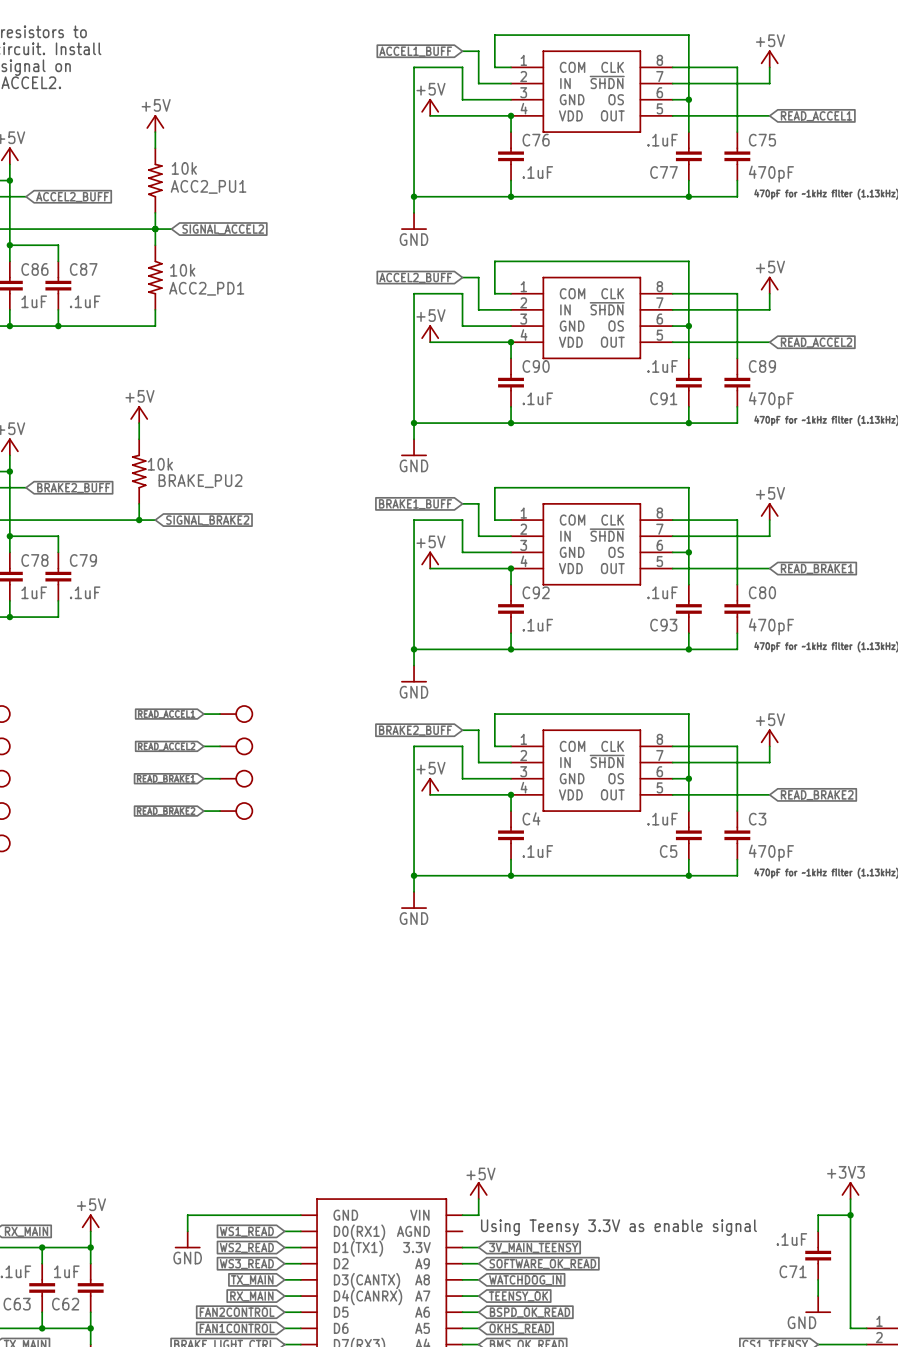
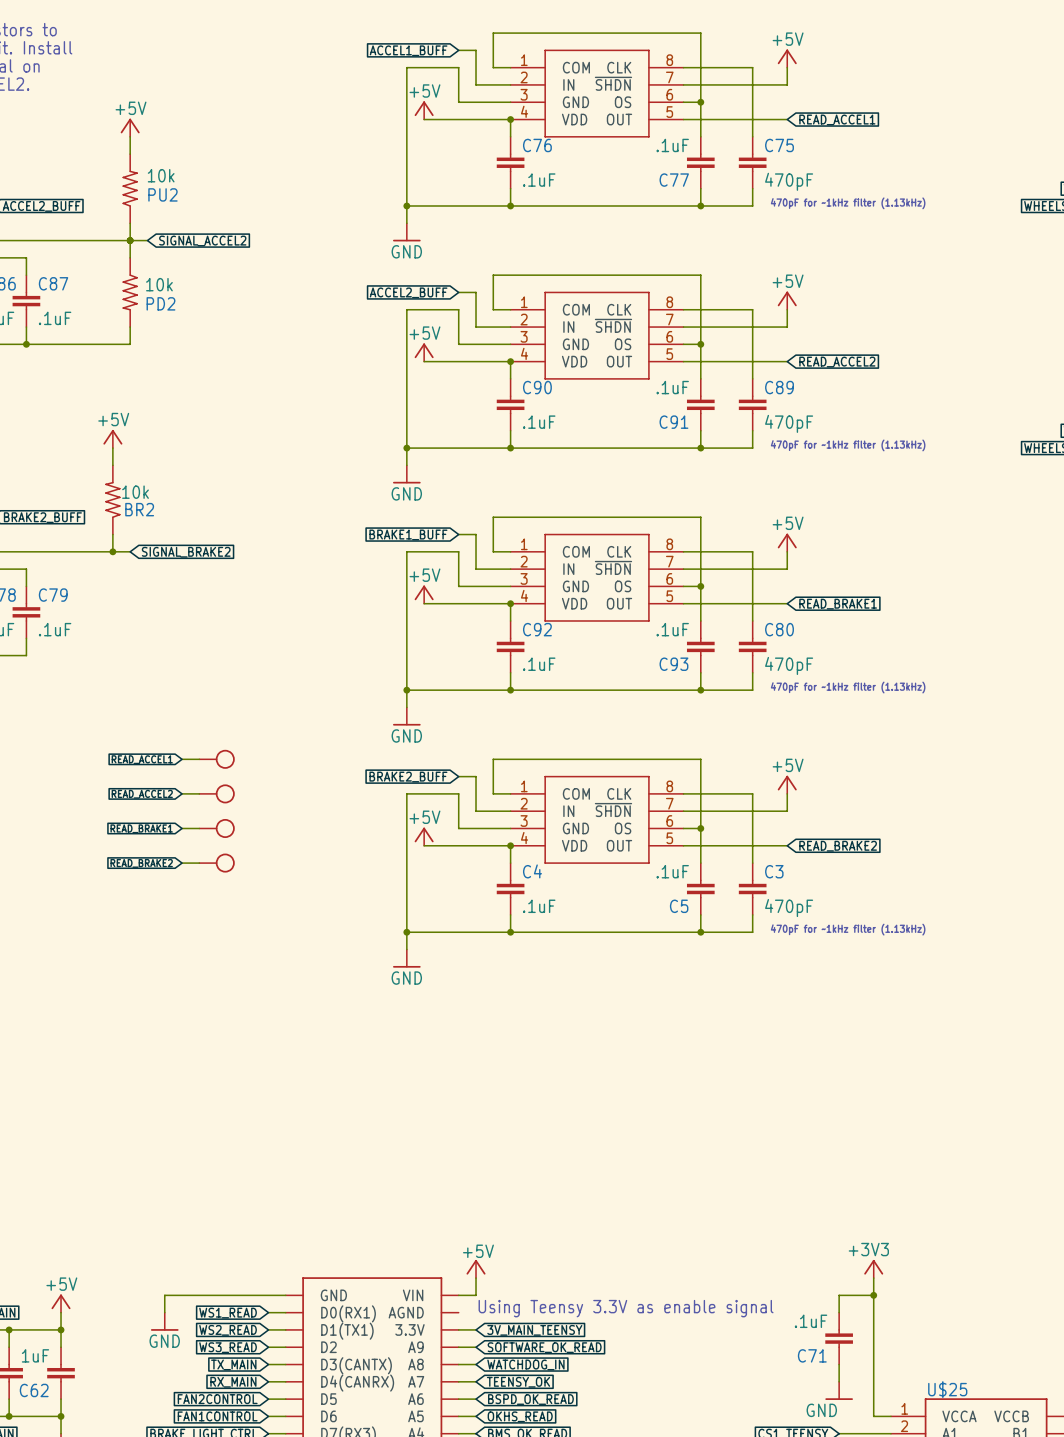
ACC2_PU1 name: ACC2_PU1 (208, 186) -> PU2 (162, 194)
ACC2_PD1 name: ACC2_PD1 (206, 288) -> PD2 (160, 303)
BRAKE_PU2 name: BRAKE_PU2 (200, 481) -> BR2 (139, 509)

